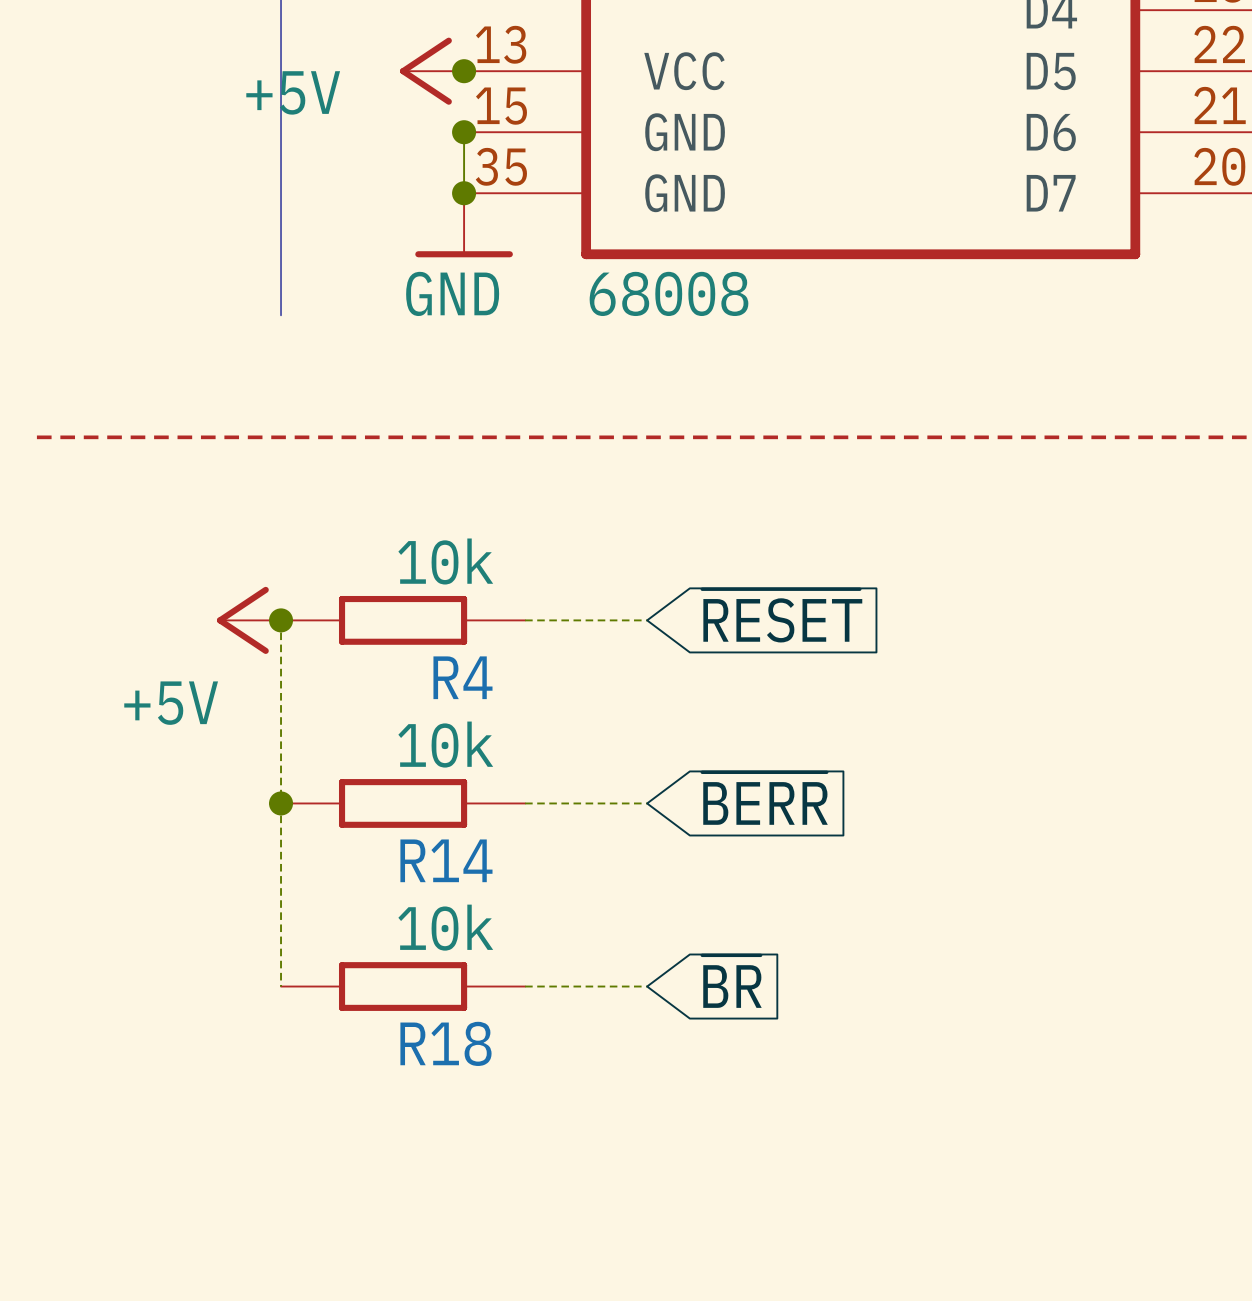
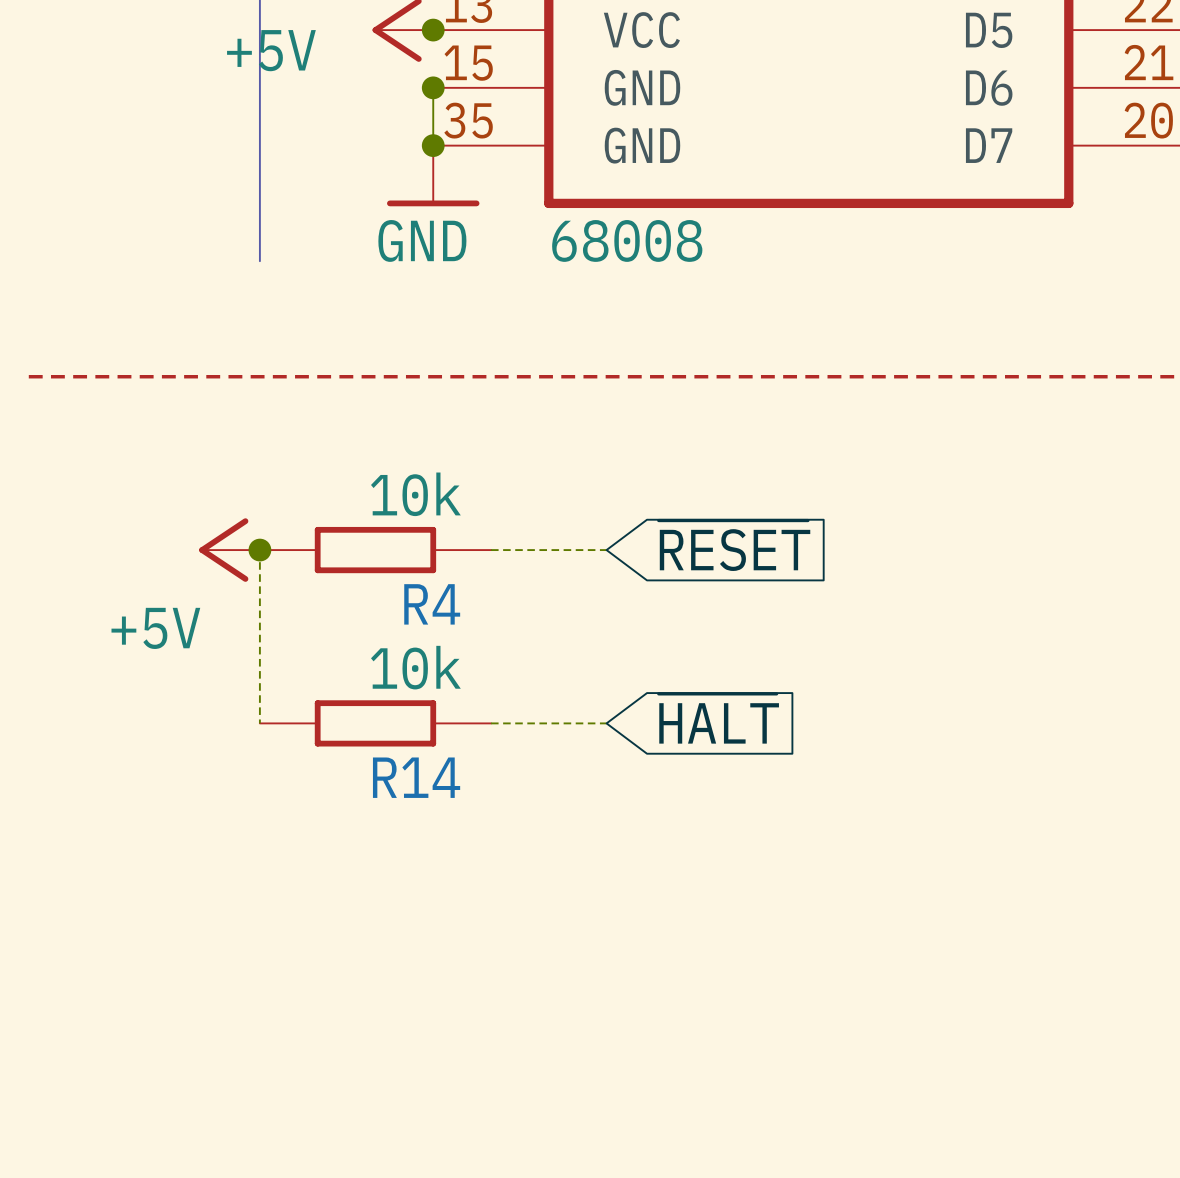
global label: ~{BERR} (765, 798) -> ~{HALT} (718, 718)
wire: (281, 803) (281, 986) -> none
junction: (281, 803) -> none
global label: ~{BR} (731, 981) -> none
R18: 10k (403, 986) -> none
wire: (525, 986) (647, 986) -> none

